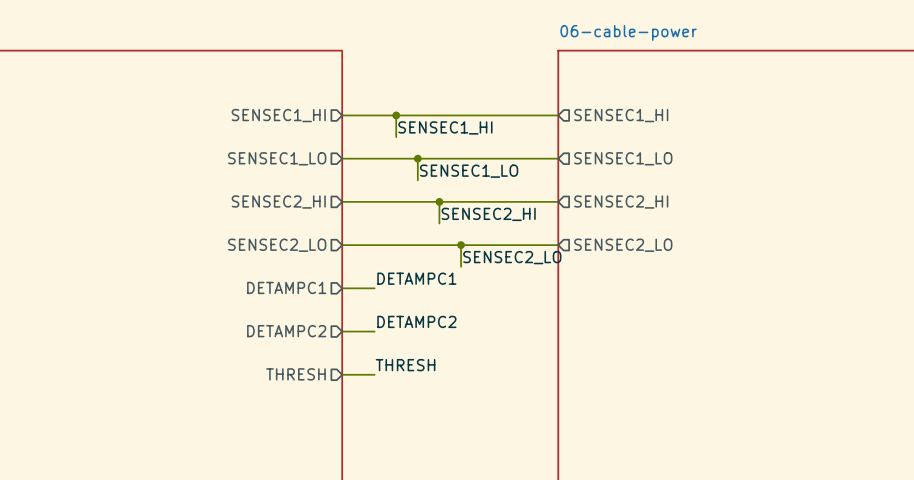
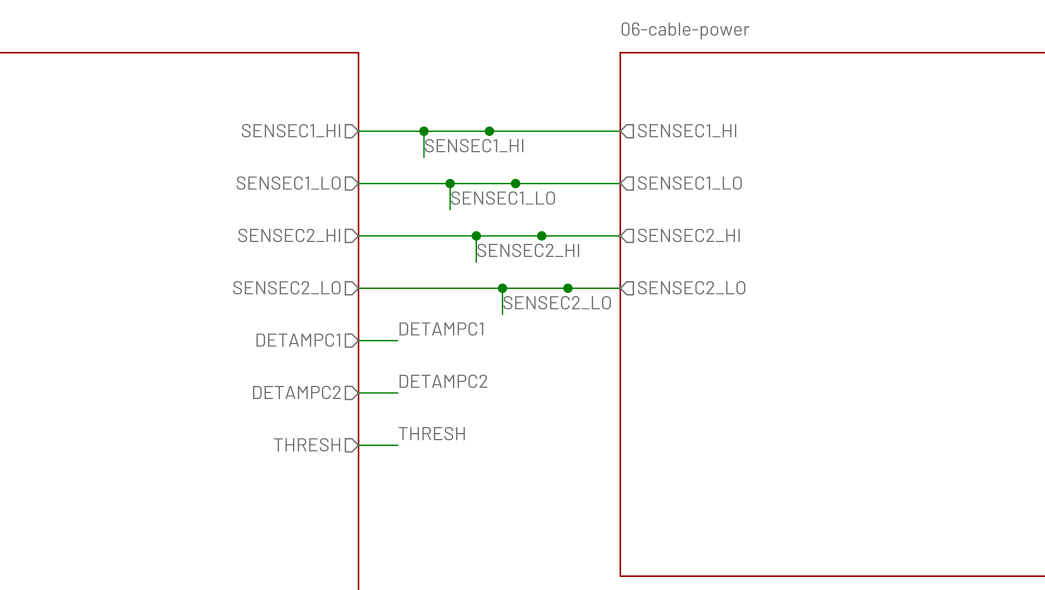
junction: none -> (489, 131)
junction: none -> (515, 183)
junction: none -> (541, 235)
junction: none -> (567, 288)

